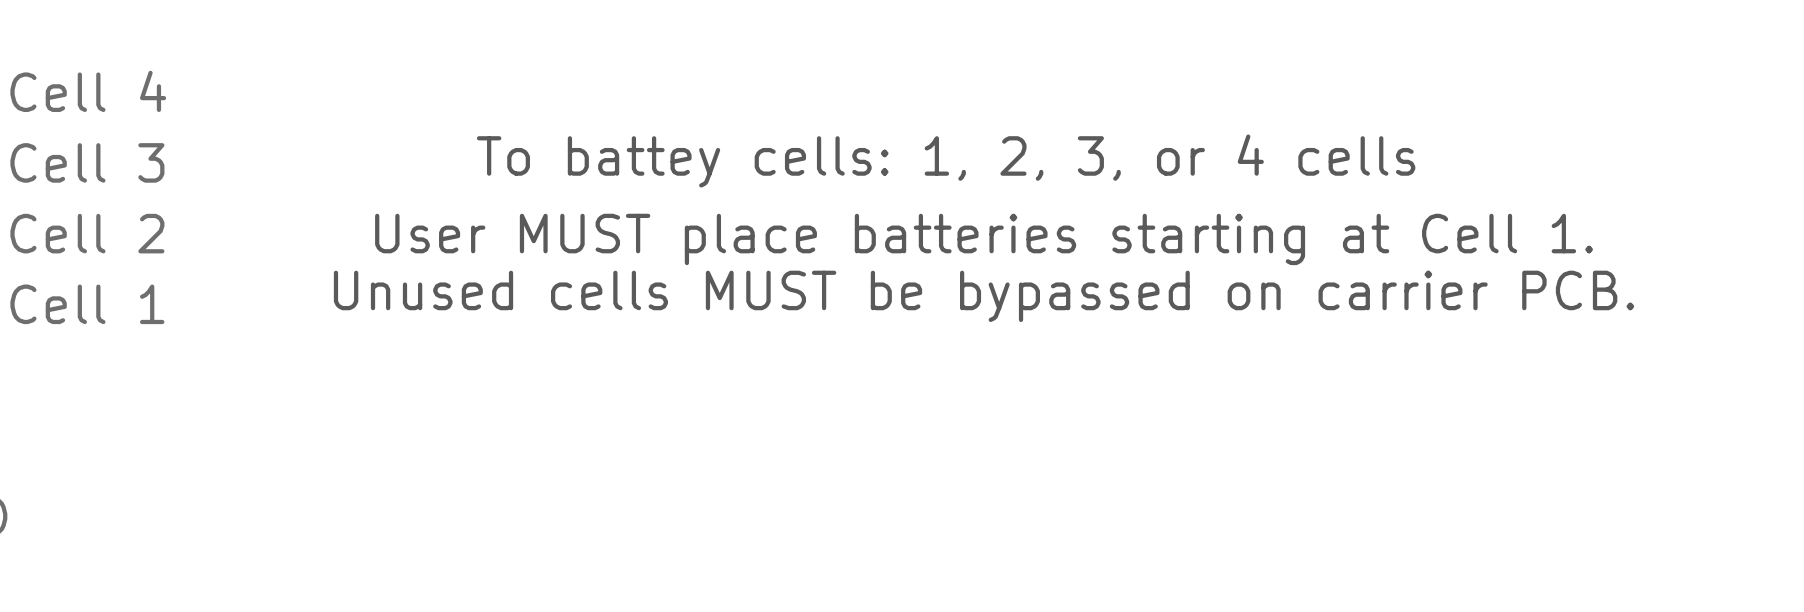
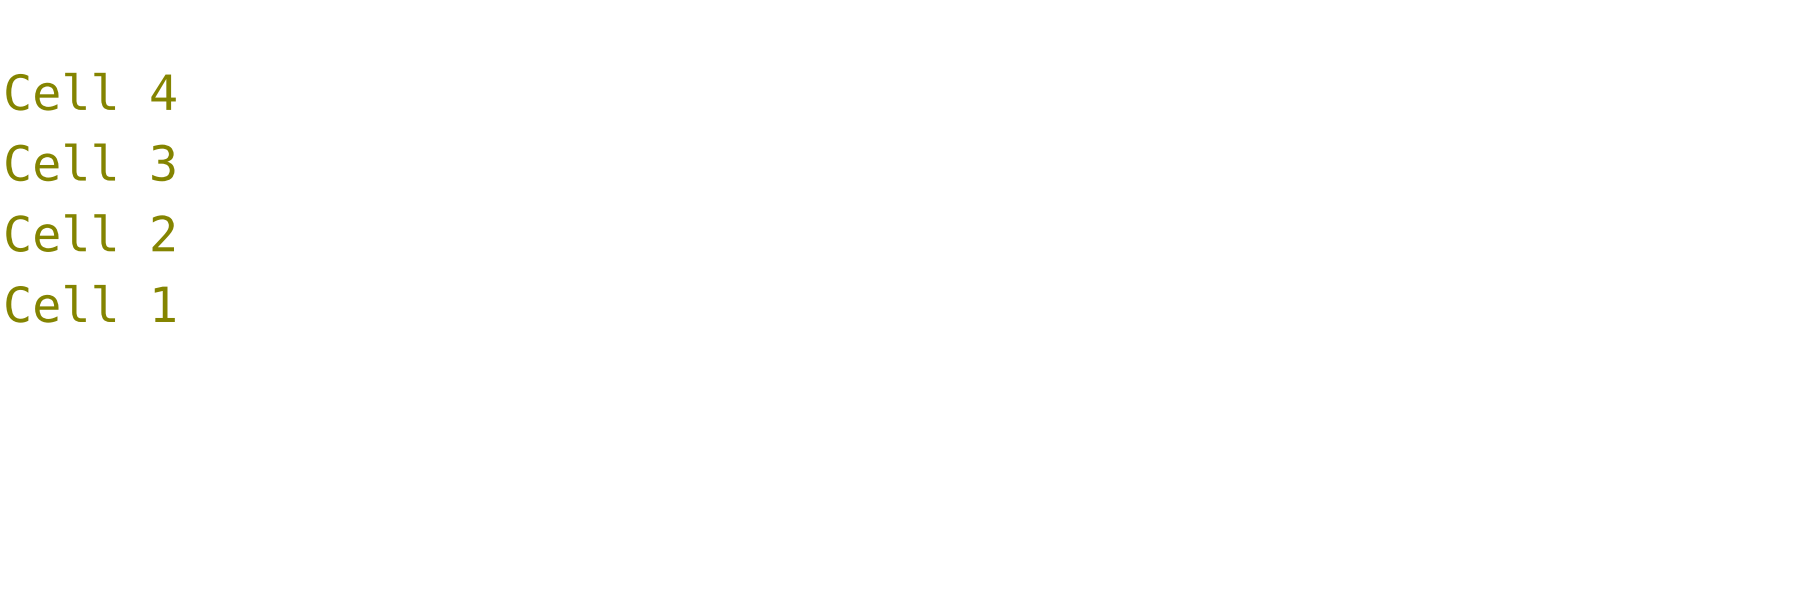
text: To battey cells: 1, 2, 3, or 4 cells (946, 161) -> none
text: User MUST place batteries starting at Cell 1. (984, 239) -> none
text: Unused cells MUST be bypassed on carrier PCB. (984, 296) -> none

